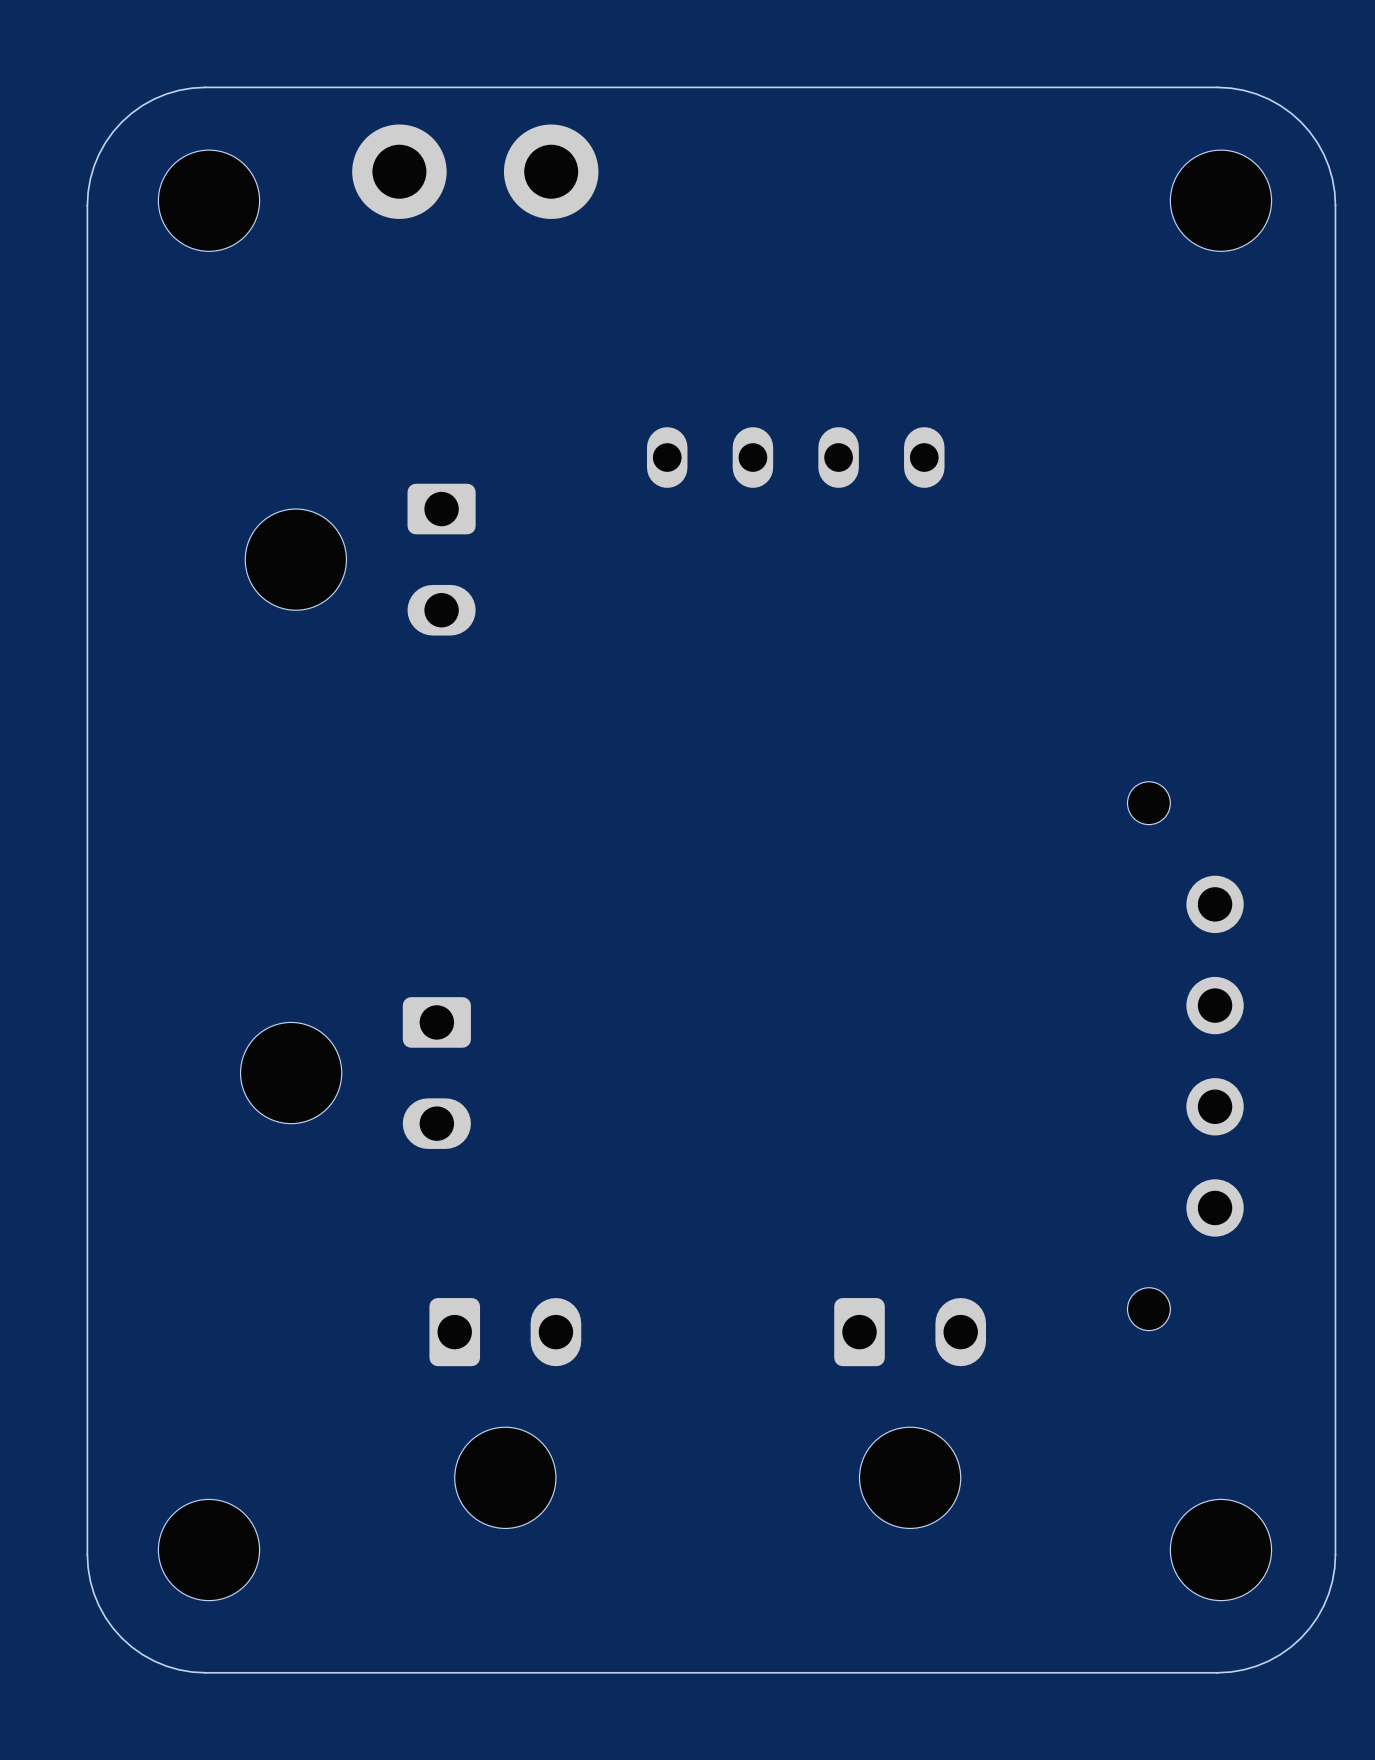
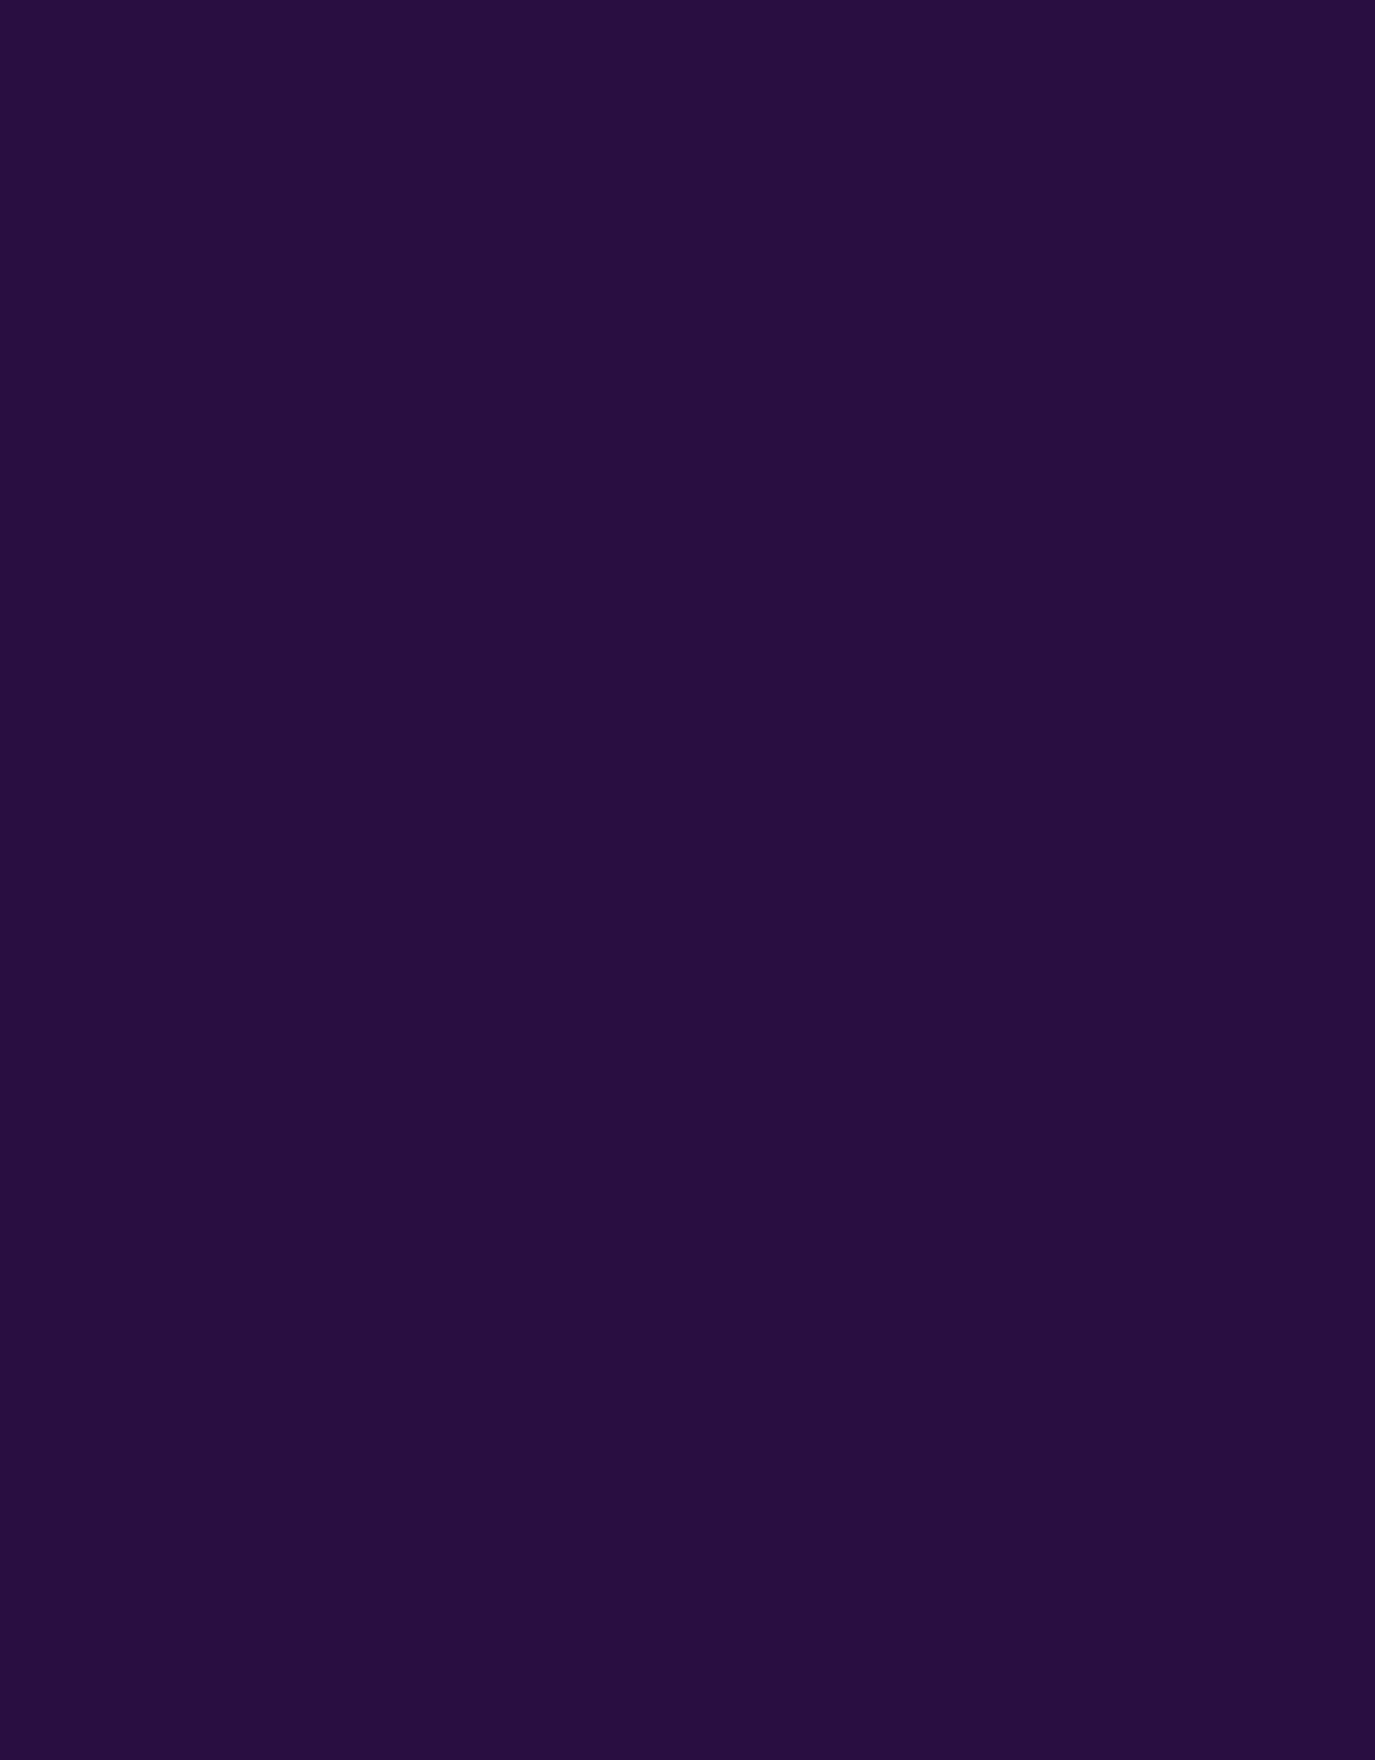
board edge: (1217, 87) (205, 87) (166, 94) (142, 105) (121, 121) (105, 142) (90, 179) (87, 205) (87, 1554) (94, 1593) (105, 1617) (121, 1638) (142, 1654) (166, 1666) (205, 1672) (1217, 1672) (1243, 1669) (1268, 1661) (1291, 1647) (1317, 1617) (1332, 1581) (1335, 1554) (1334, 192) (1323, 154) (1300, 121) (1268, 99) (1243, 90) (1217, 87) -> none
part: (399, 171) -> none
part: (551, 171) -> none
part: (208, 200) -> none
part: (1220, 200) -> none
part: (795, 457) -> none
part: (360, 559) -> none
part: (1185, 1056) -> none
part: (355, 1073) -> none
part: (505, 1413) -> none
part: (910, 1413) -> none
part: (208, 1550) -> none
part: (1220, 1550) -> none

